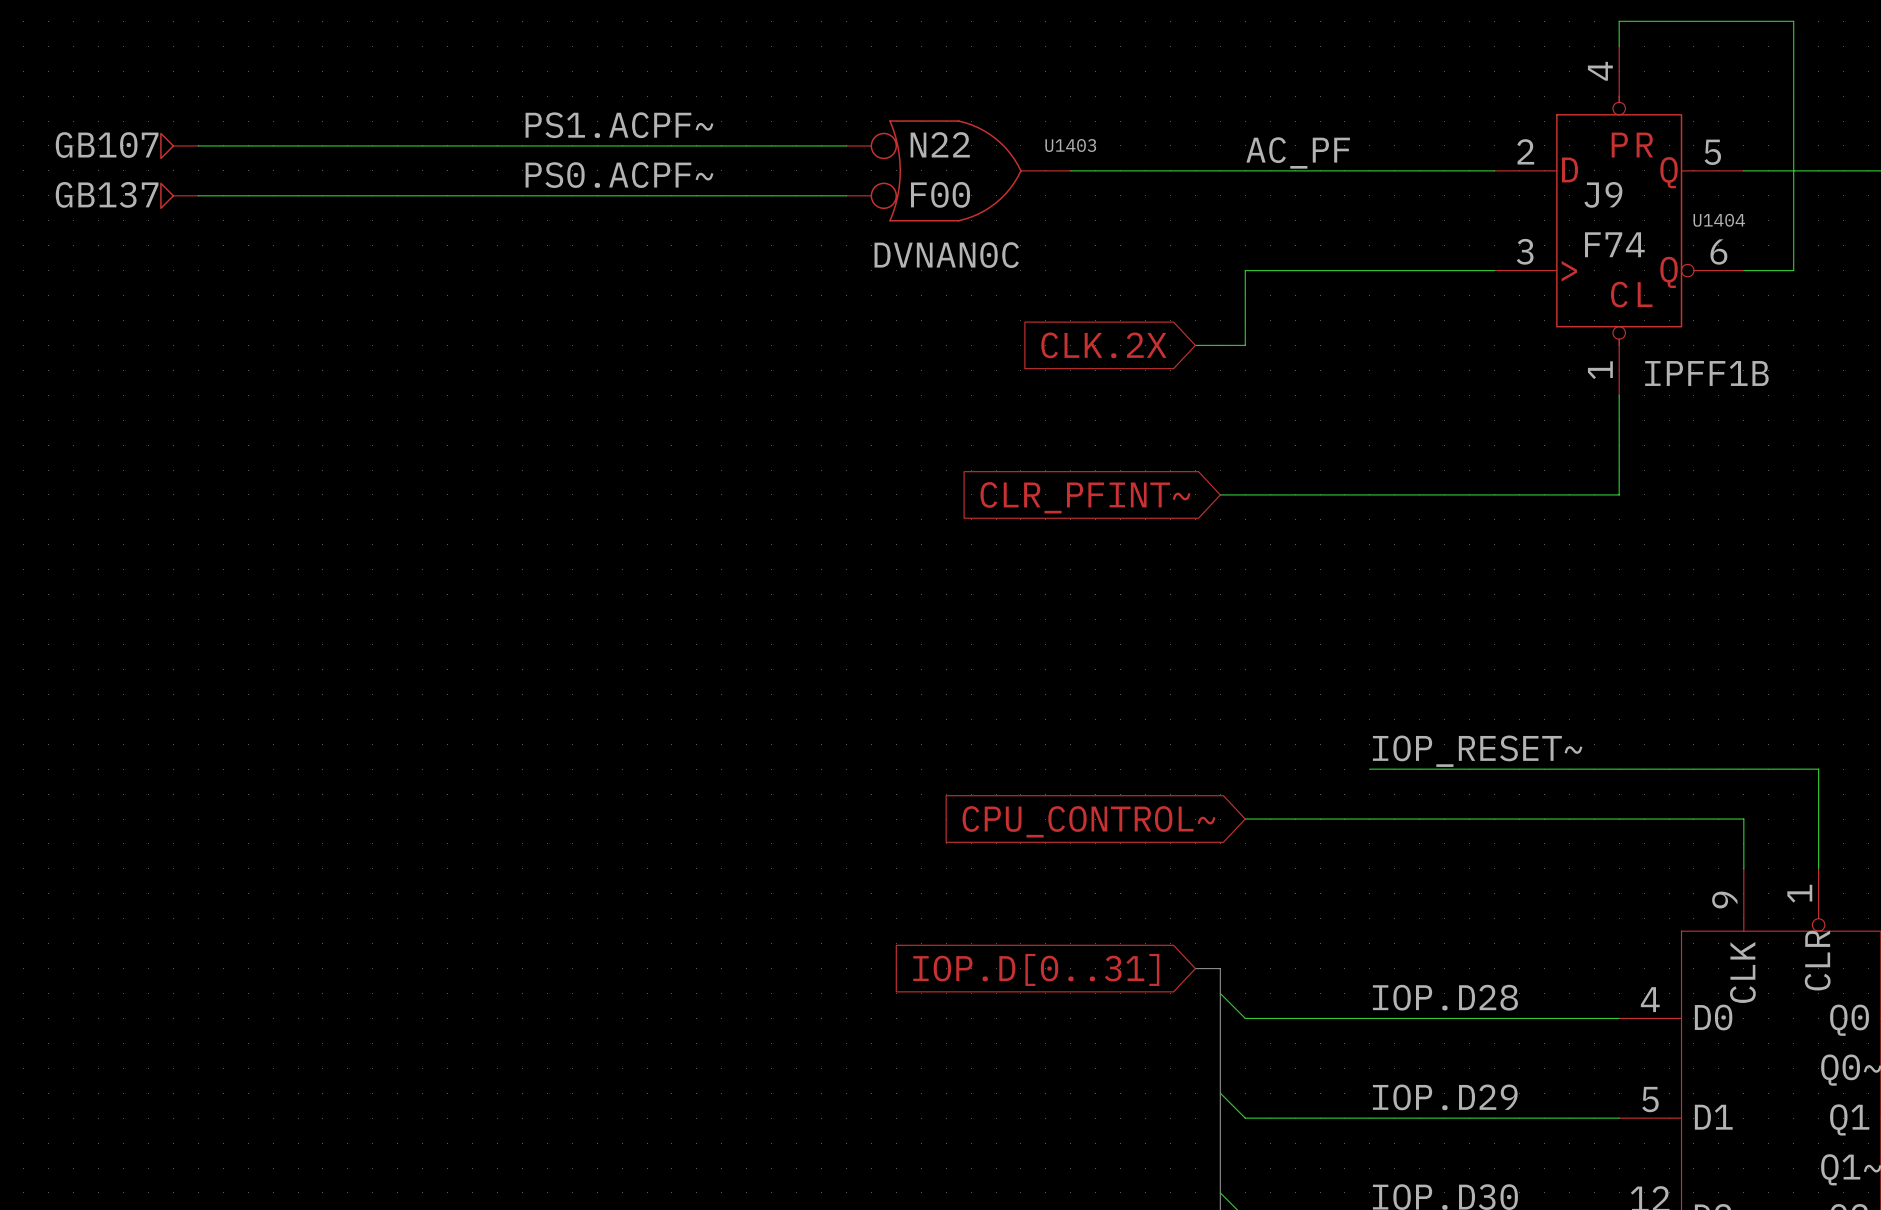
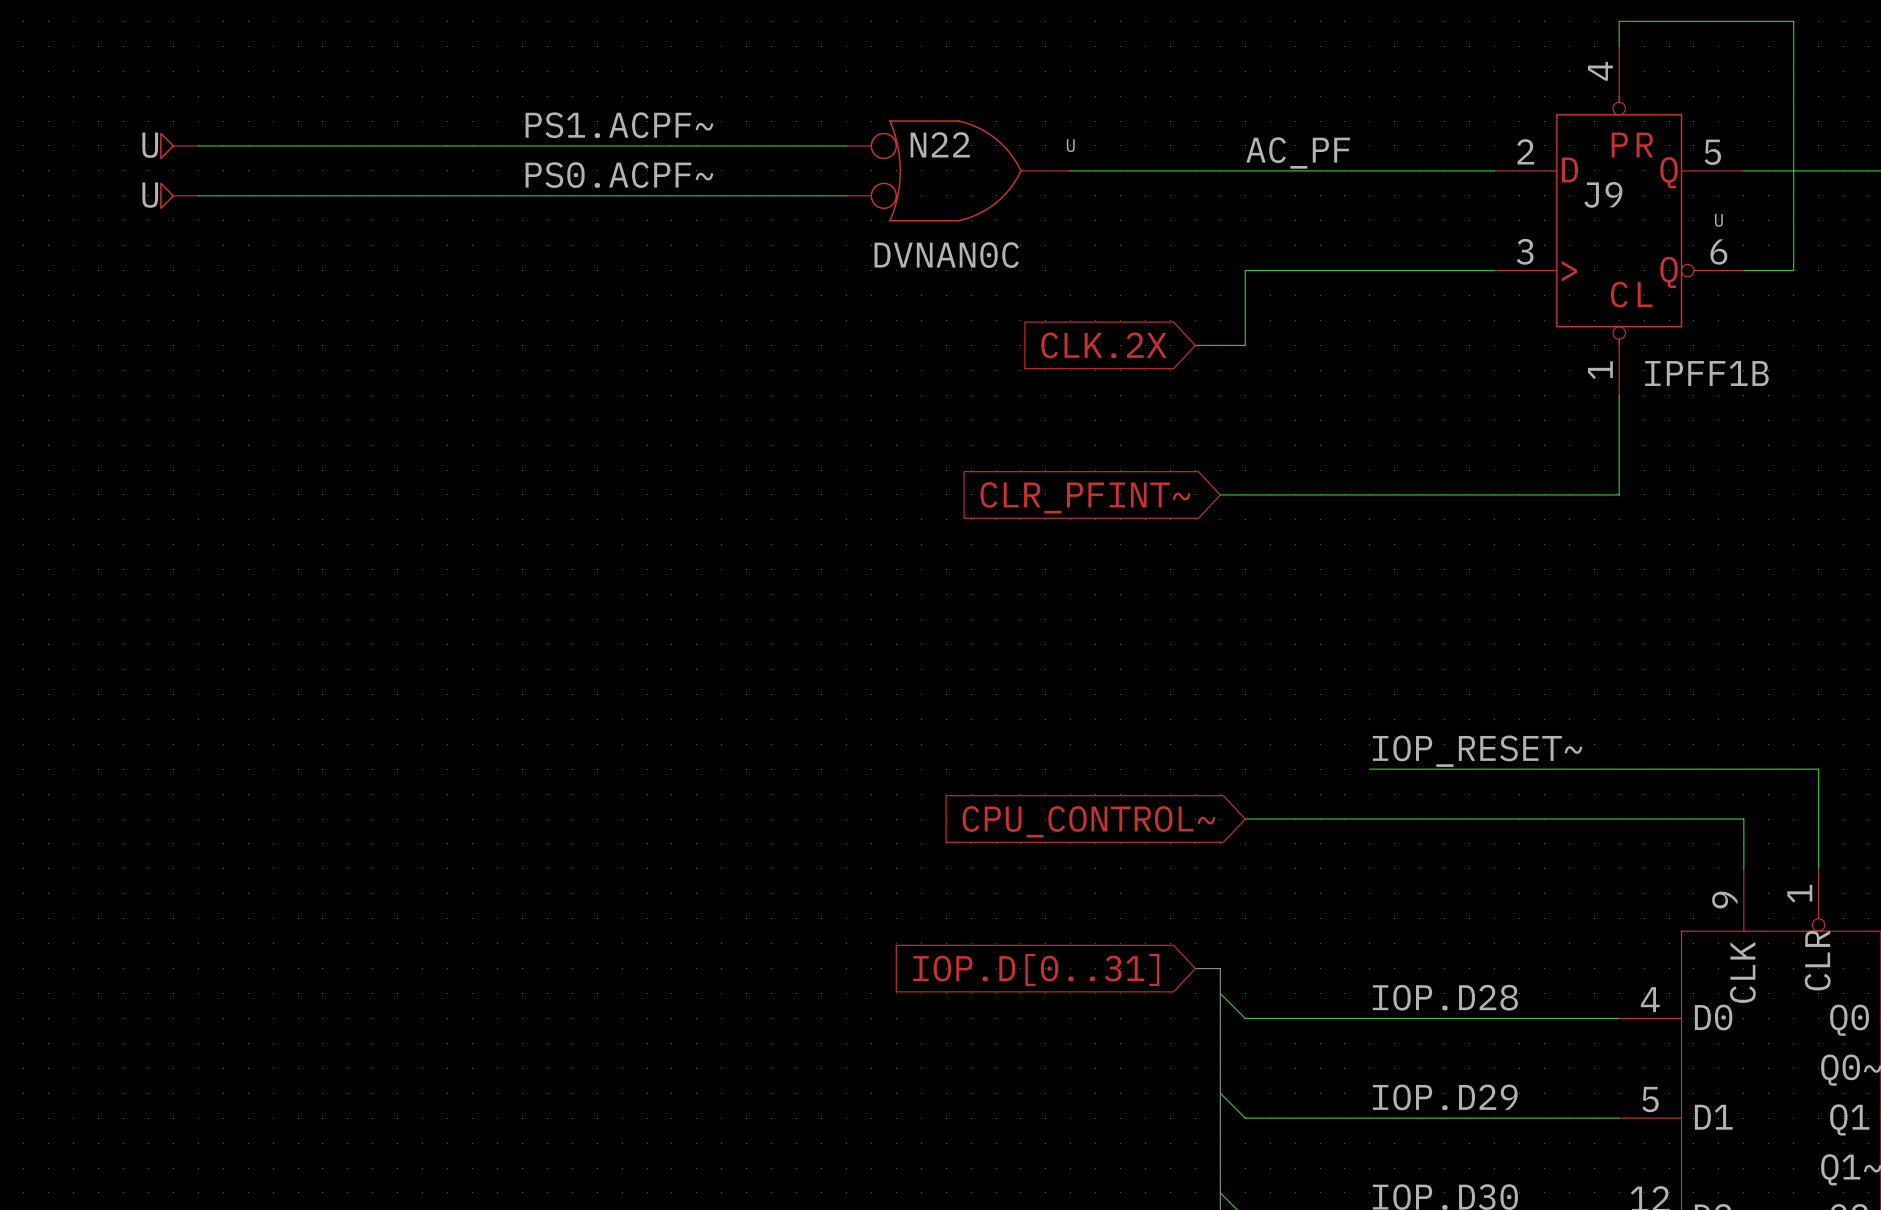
GB107 name: GB107 (107, 145) -> U (150, 145)
U1403 name: U1403 (1070, 145) -> U (1070, 145)
GB137 name: GB137 (107, 194) -> U (150, 195)
U1403 value: F00 (940, 194) -> none
U1404 name: U1404 (1719, 220) -> U (1718, 220)
U1404 value: F74 (1614, 244) -> none

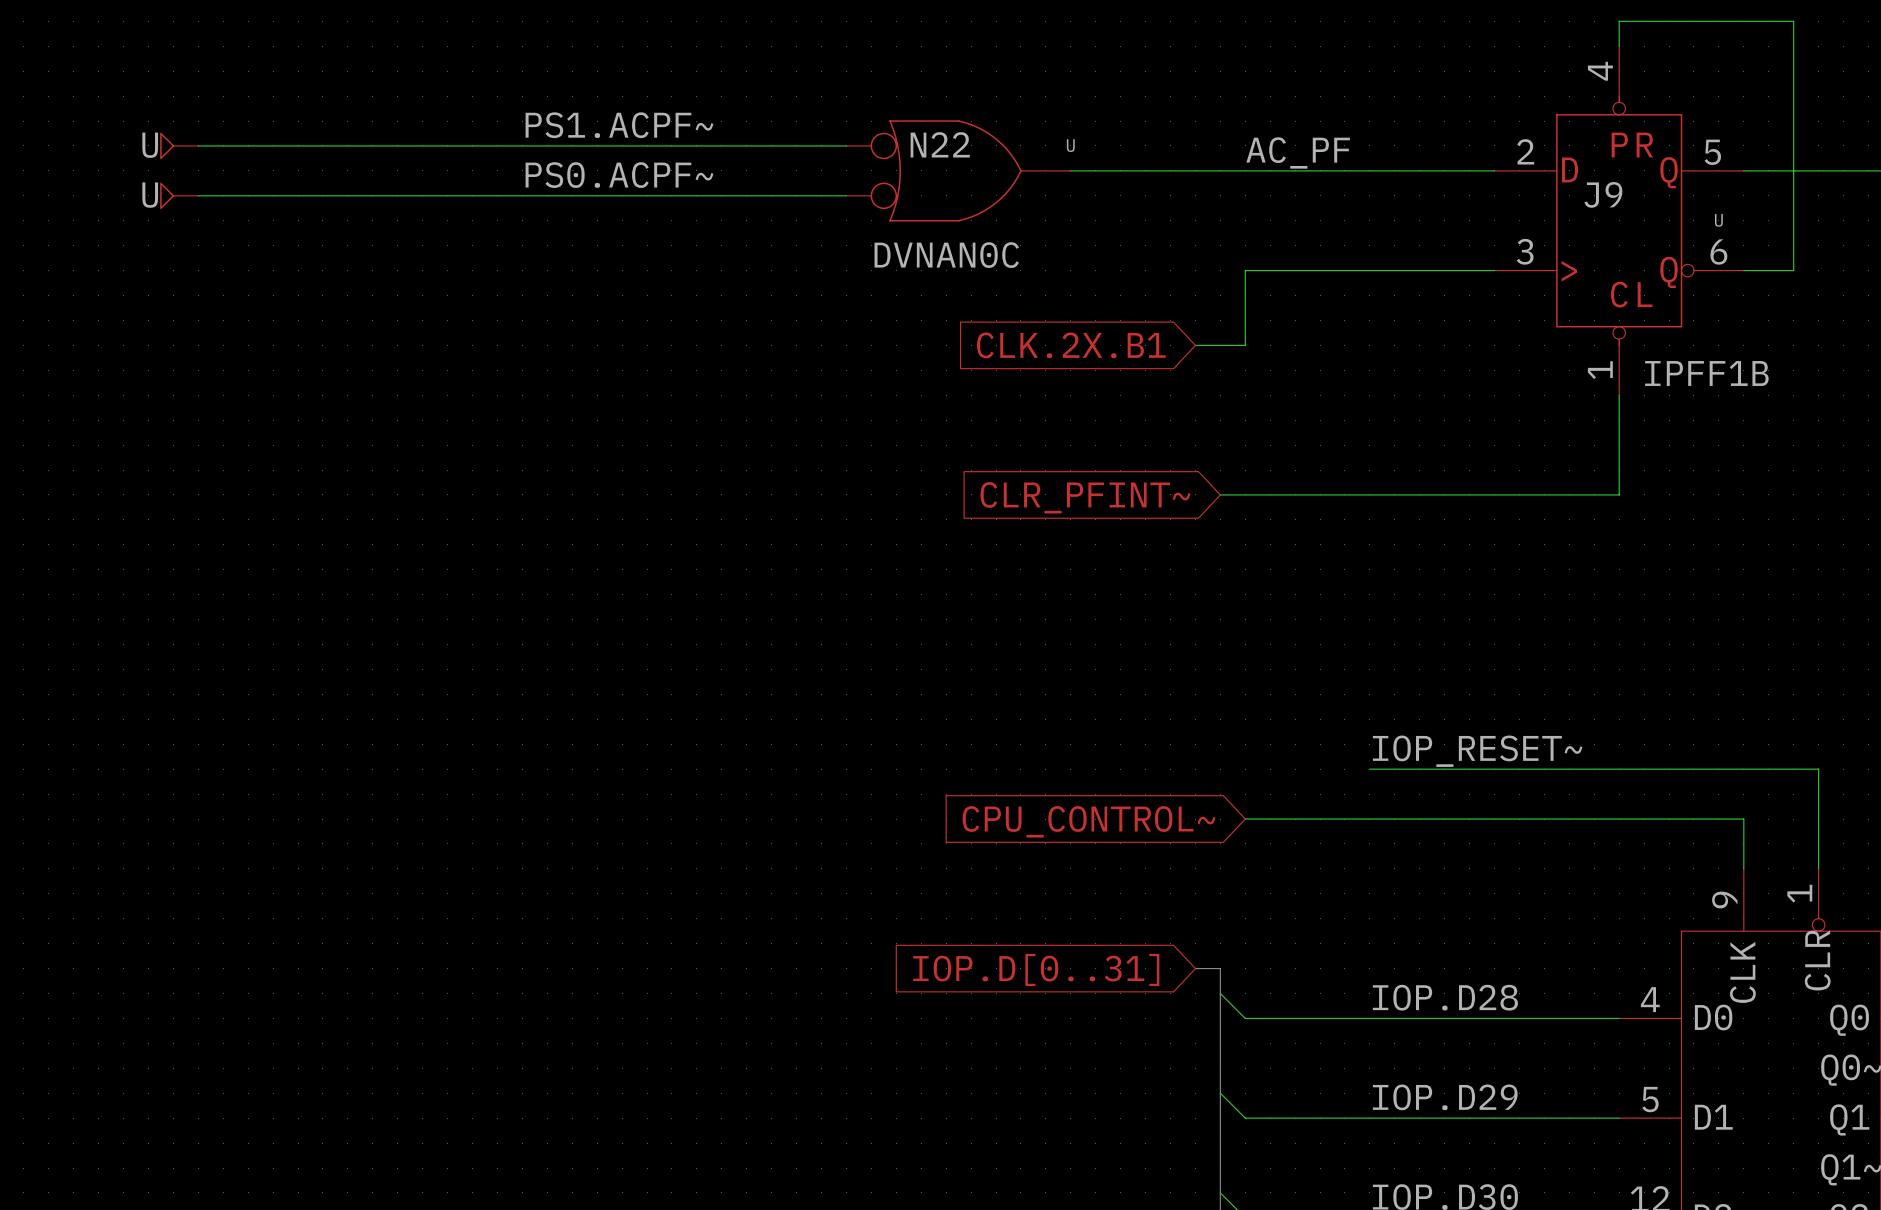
global label: CLK.2X (1103, 345) -> CLK.2X.B1 (1071, 345)

